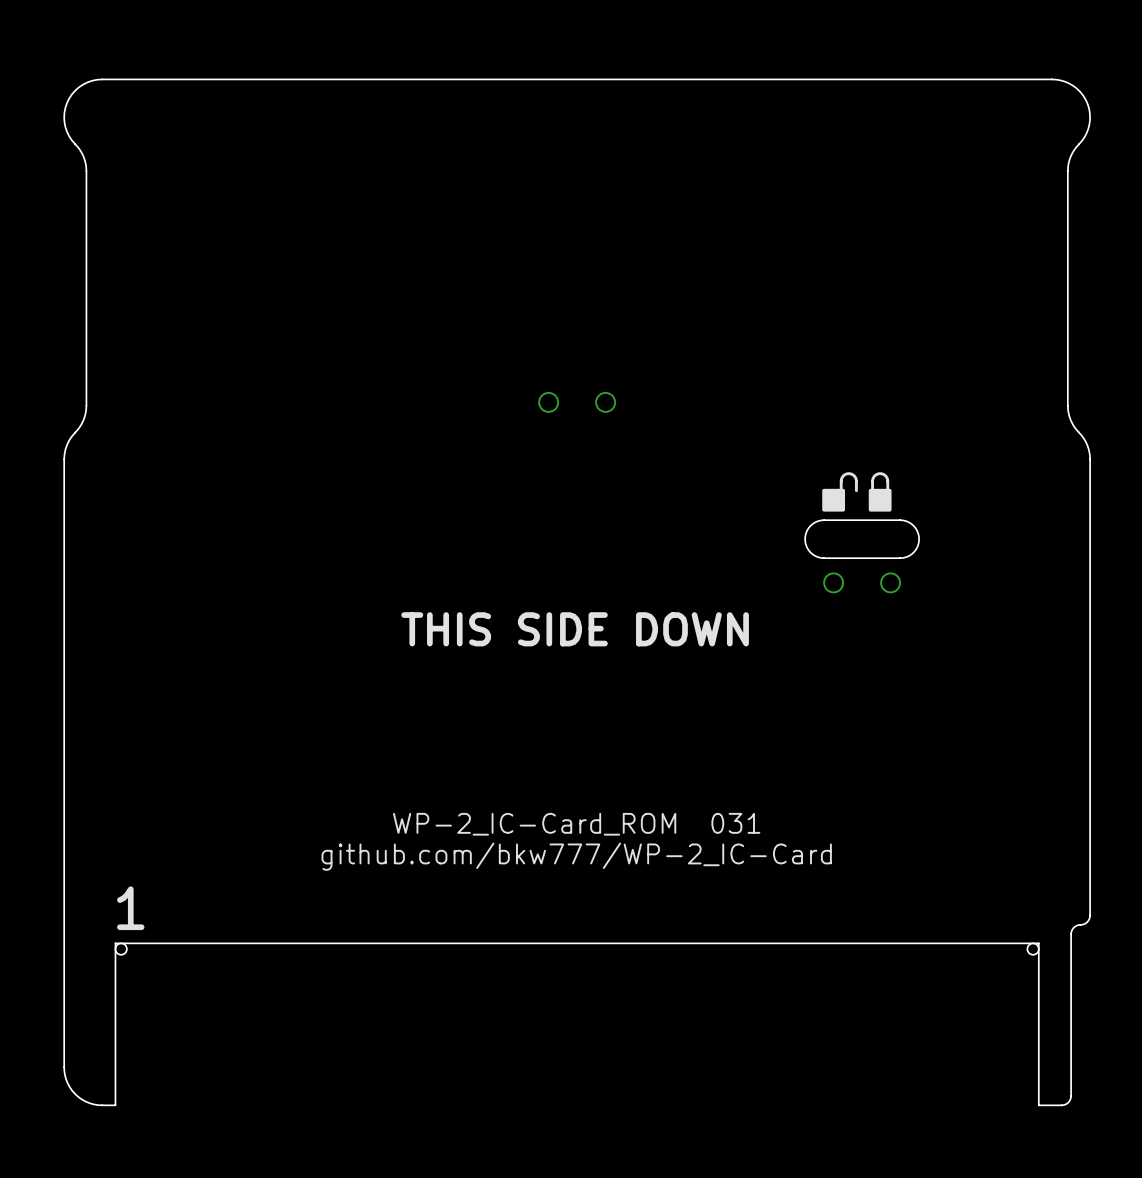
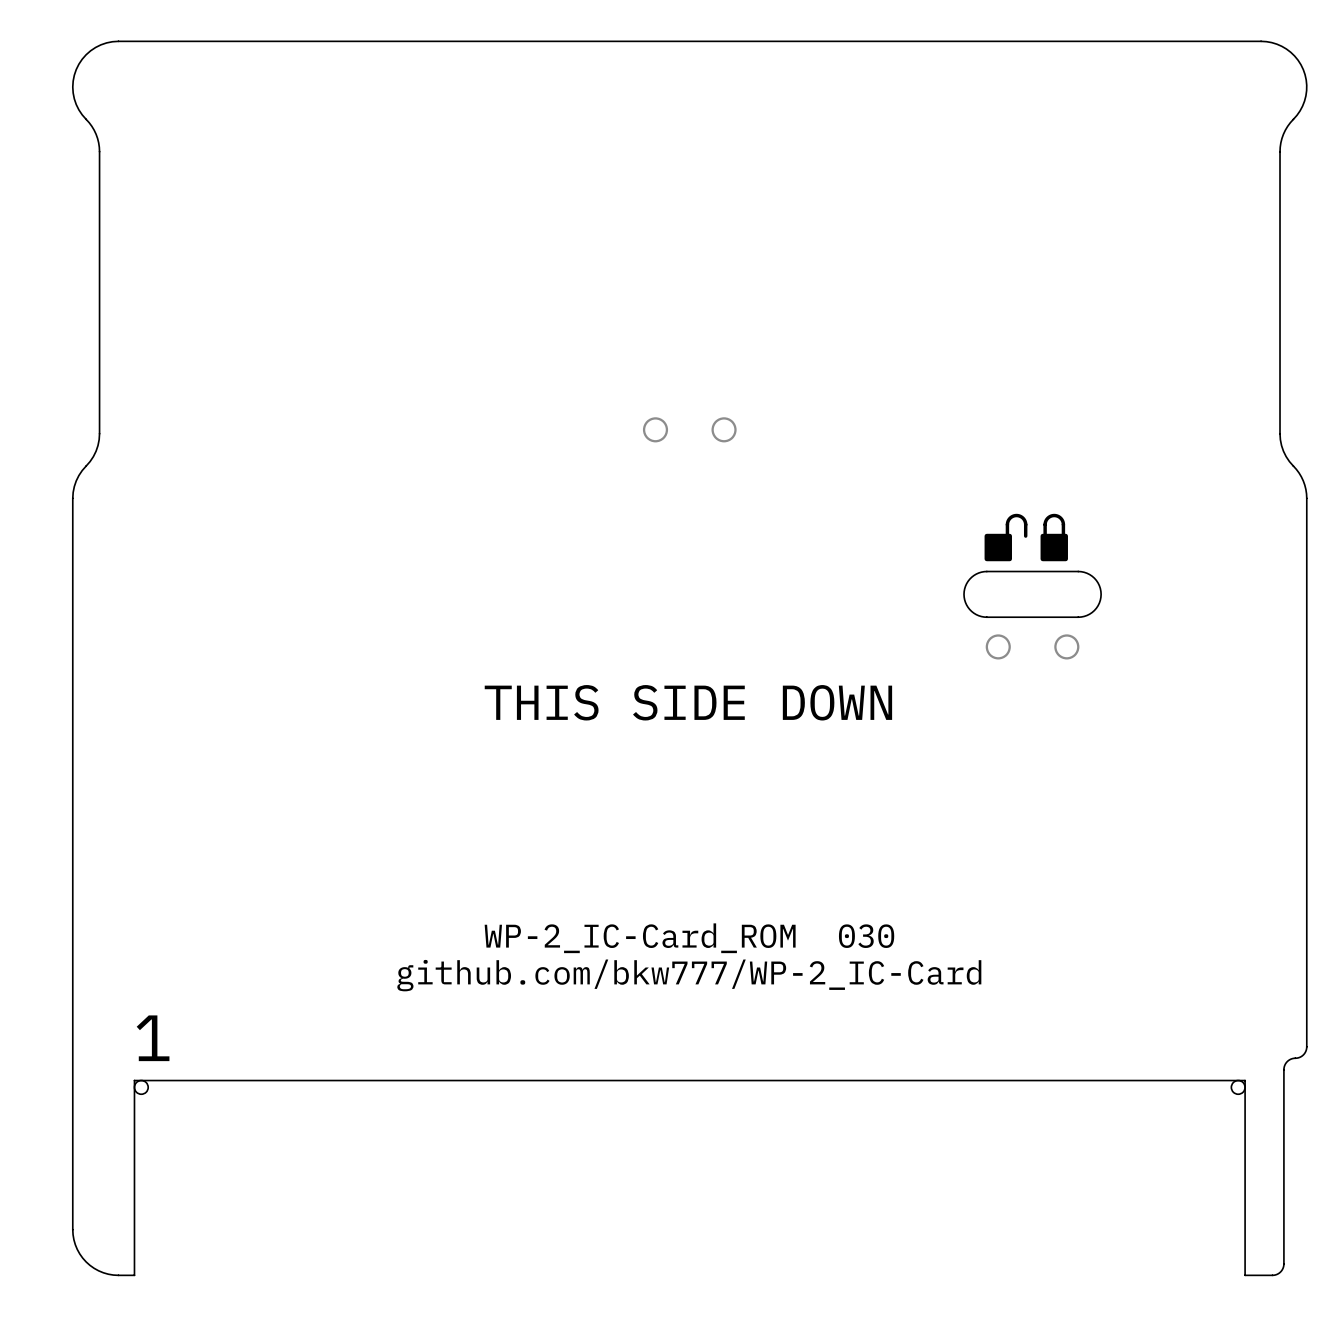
text: WP-2_IC-Card_ROM 031 (576, 824) -> WP-2_IC-Card_ROM 030 (689, 938)

